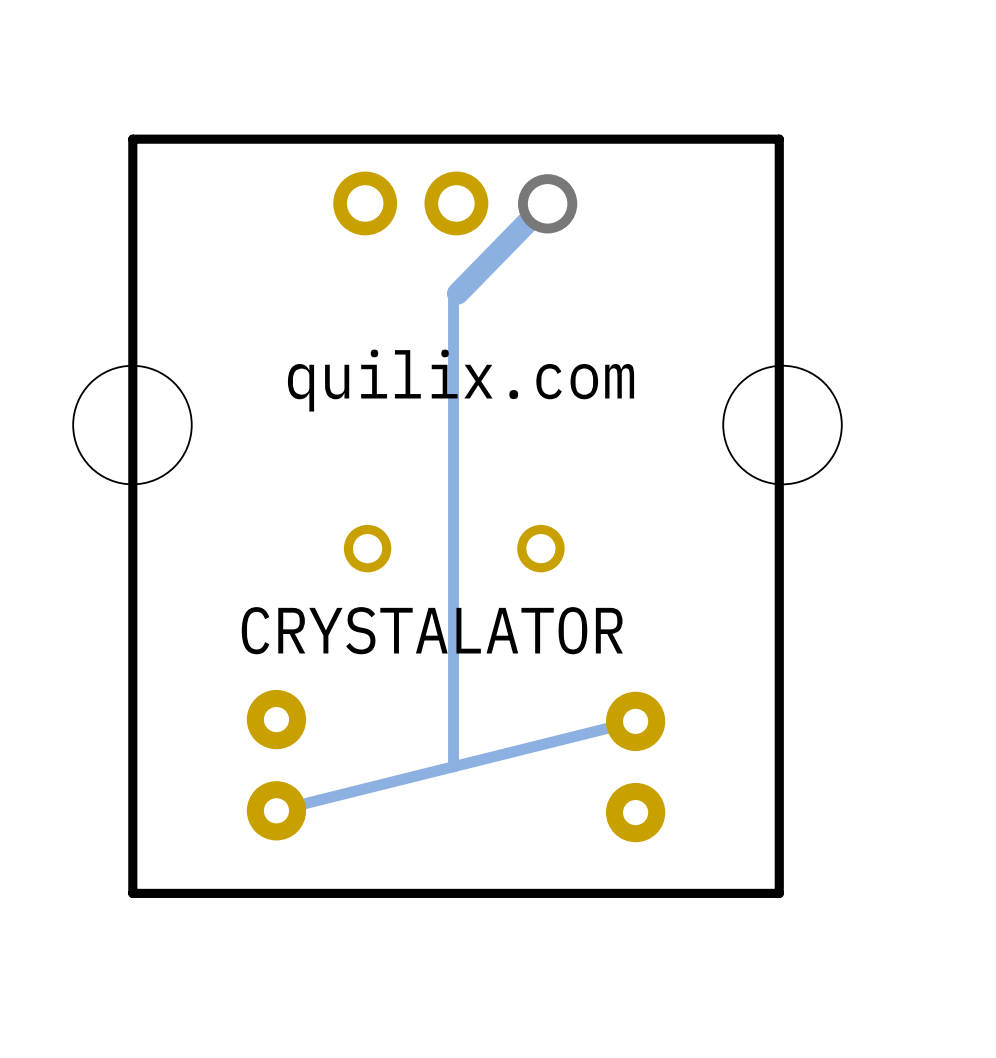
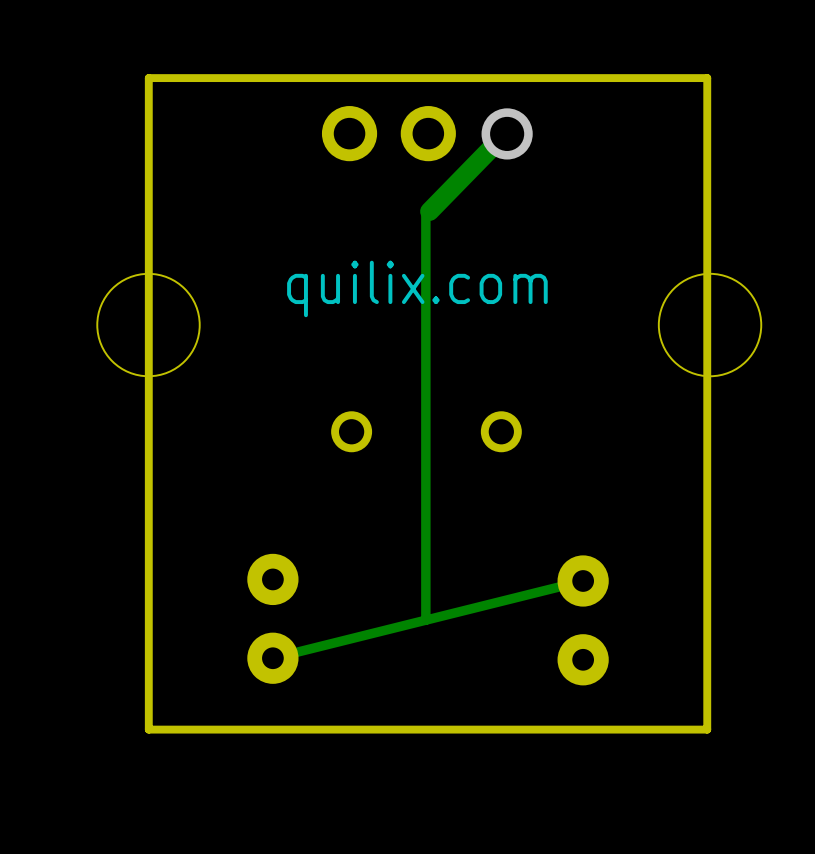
text: CRYSTALATOR (432, 630) -> none

